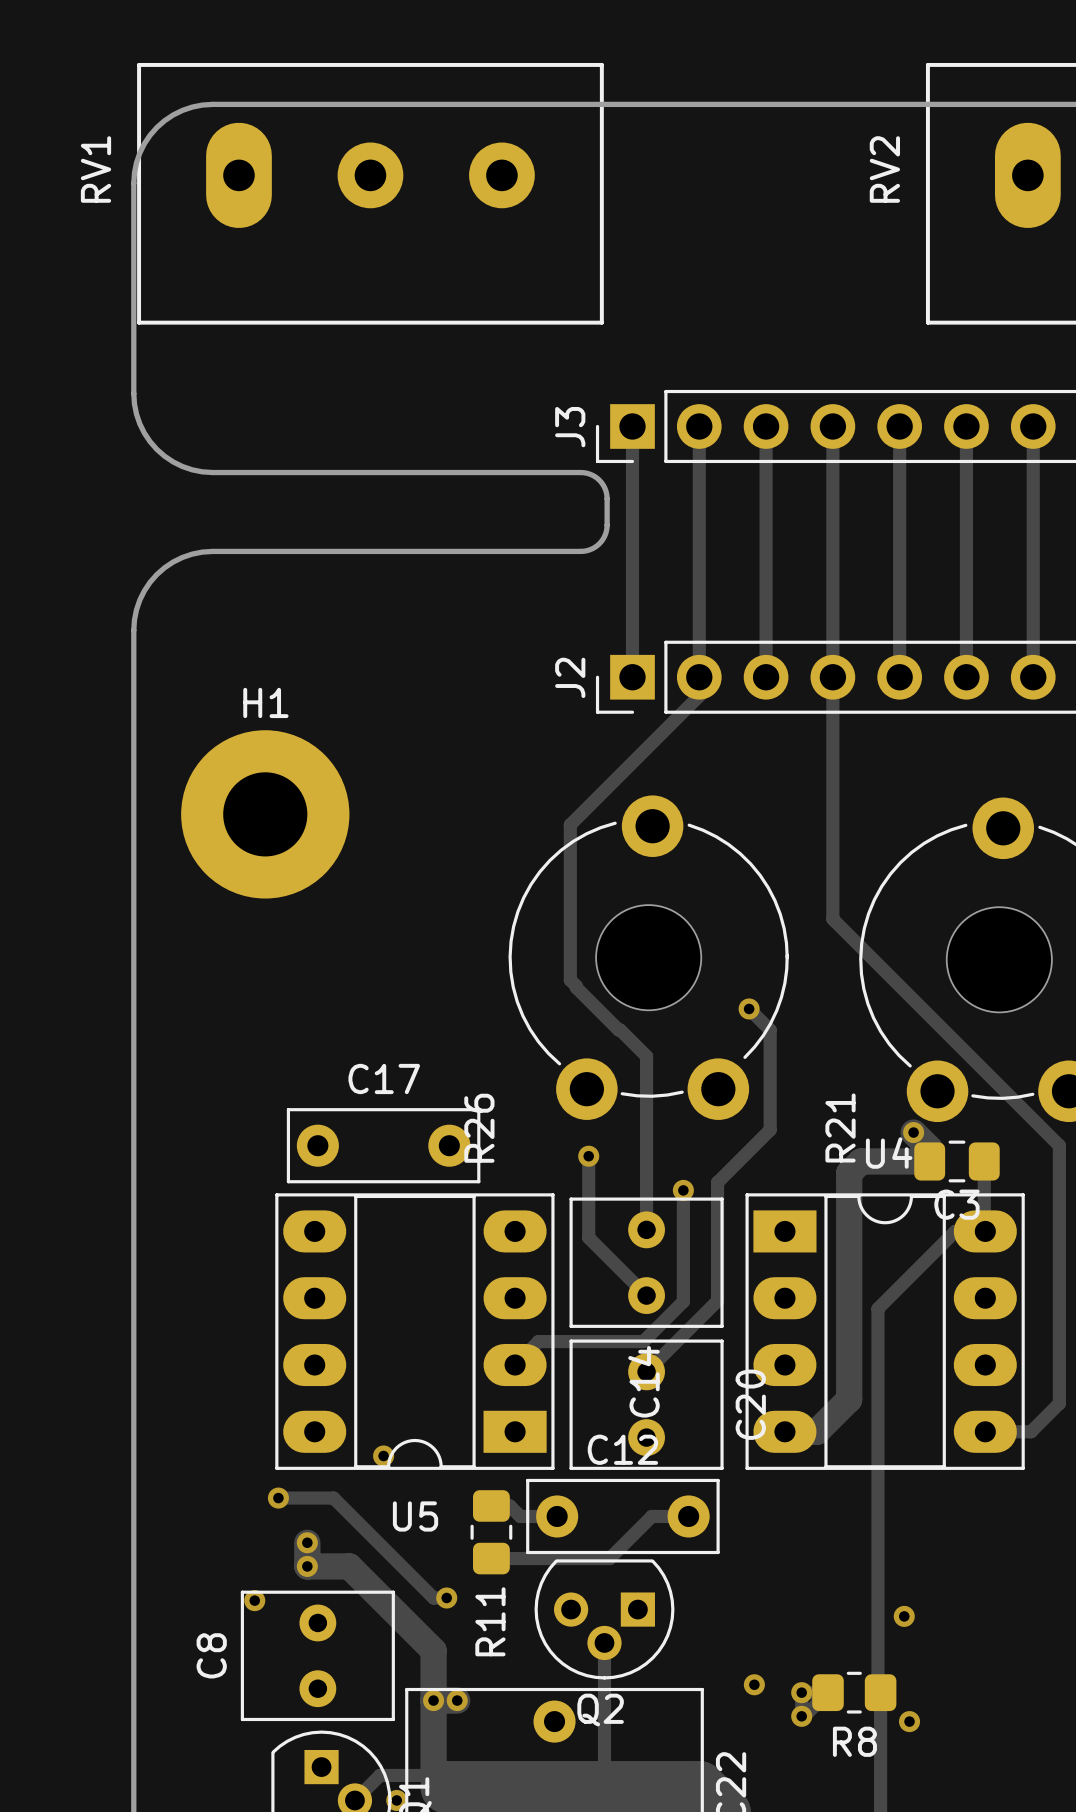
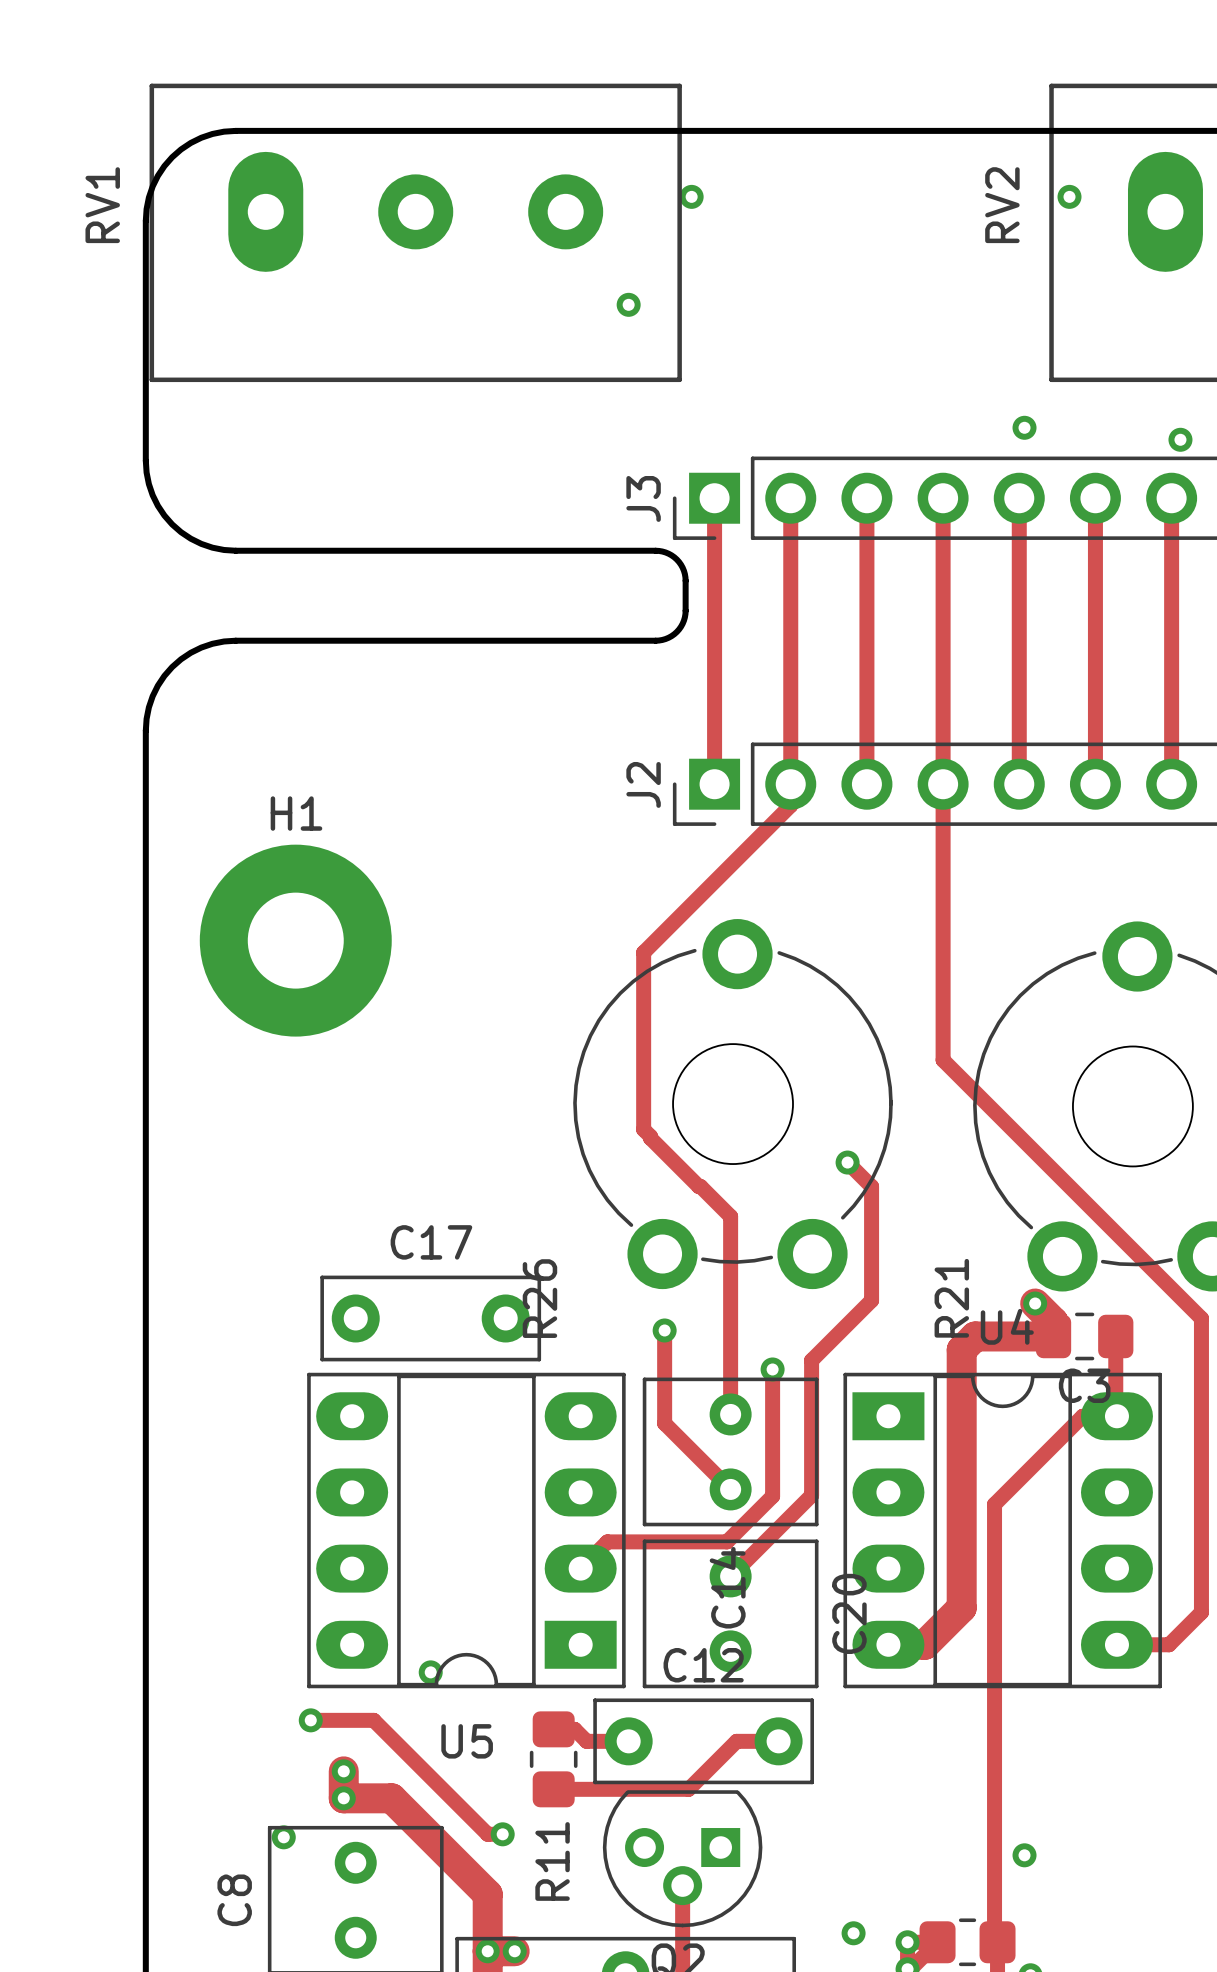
via: none -> (691, 196)
via: none -> (1069, 196)
via: none -> (628, 304)
via: none -> (1024, 427)
via: none -> (1180, 439)

